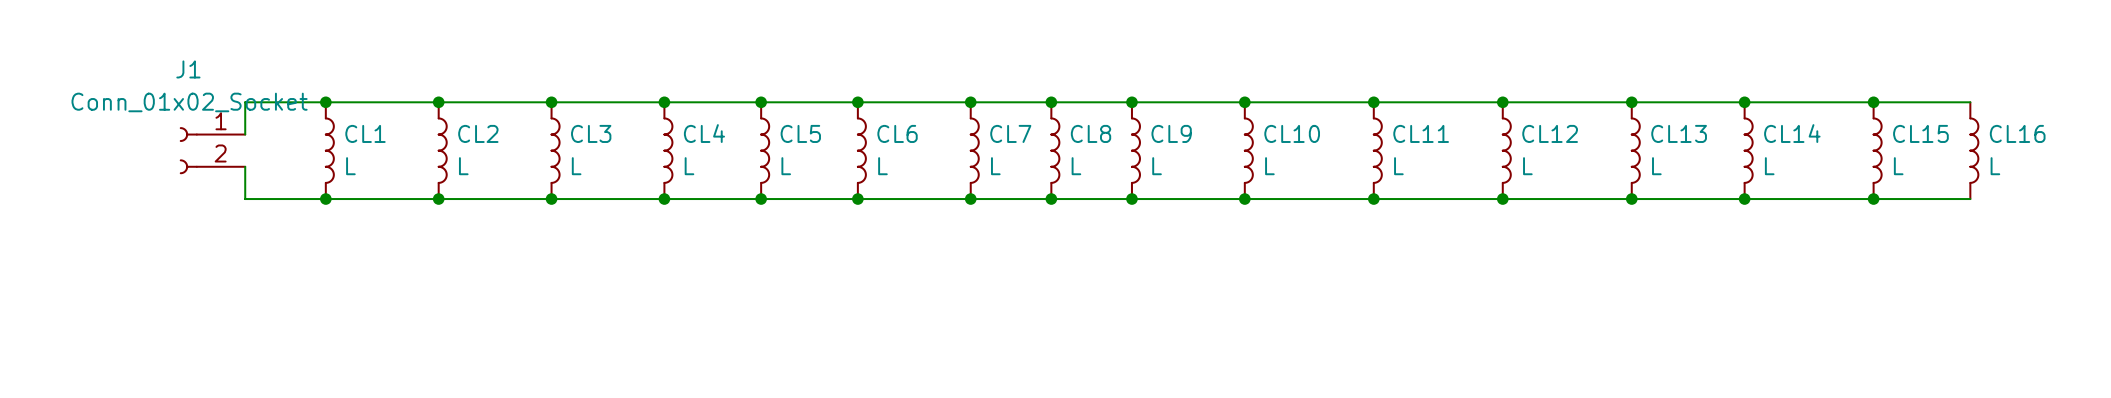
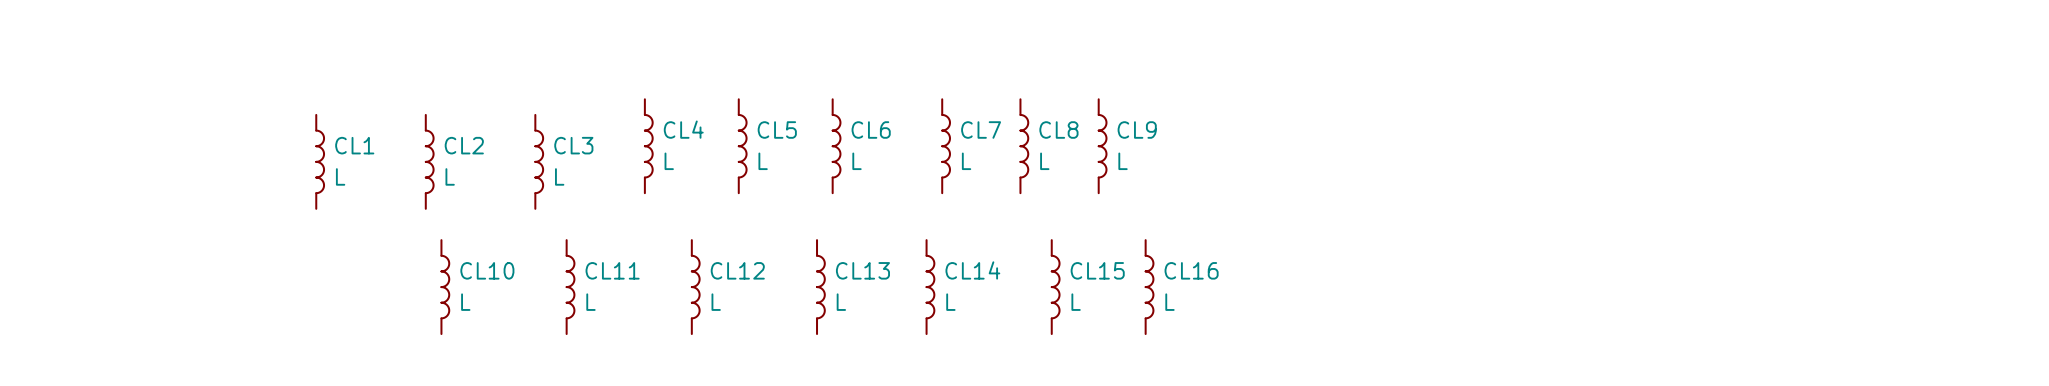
junction: (325, 102) -> none
junction: (438, 102) -> none
junction: (551, 102) -> none
junction: (664, 102) -> none
junction: (761, 102) -> none
junction: (857, 102) -> none
junction: (970, 102) -> none
junction: (1051, 102) -> none
junction: (1131, 102) -> none
junction: (1244, 102) -> none
junction: (1373, 102) -> none
junction: (1502, 102) -> none
junction: (1631, 102) -> none
junction: (1744, 102) -> none
junction: (1873, 102) -> none
wire: (1970, 102) (245, 102) (245, 134) -> none
J1: Conn_01x02_Socket (212, 150) -> none
CL1 position: (329, 150) -> (320, 161)
CL2 position: (442, 150) -> (429, 161)
CL3 position: (555, 150) -> (539, 161)
CL10 position: (1248, 150) -> (445, 287)
CL11 position: (1377, 150) -> (570, 287)
CL12 position: (1506, 150) -> (695, 287)
CL13 position: (1635, 150) -> (820, 287)
CL14 position: (1748, 150) -> (930, 287)
CL15 position: (1877, 150) -> (1055, 287)
CL16 position: (1974, 150) -> (1149, 287)
wire: (245, 166) (245, 199) (1970, 199) -> none
junction: (325, 199) -> none
junction: (438, 199) -> none
junction: (551, 199) -> none
junction: (664, 199) -> none
junction: (761, 199) -> none
junction: (857, 199) -> none
junction: (970, 199) -> none
junction: (1051, 199) -> none
junction: (1131, 199) -> none
junction: (1244, 199) -> none
junction: (1373, 199) -> none
junction: (1502, 199) -> none
junction: (1631, 199) -> none
junction: (1744, 199) -> none
junction: (1873, 199) -> none

